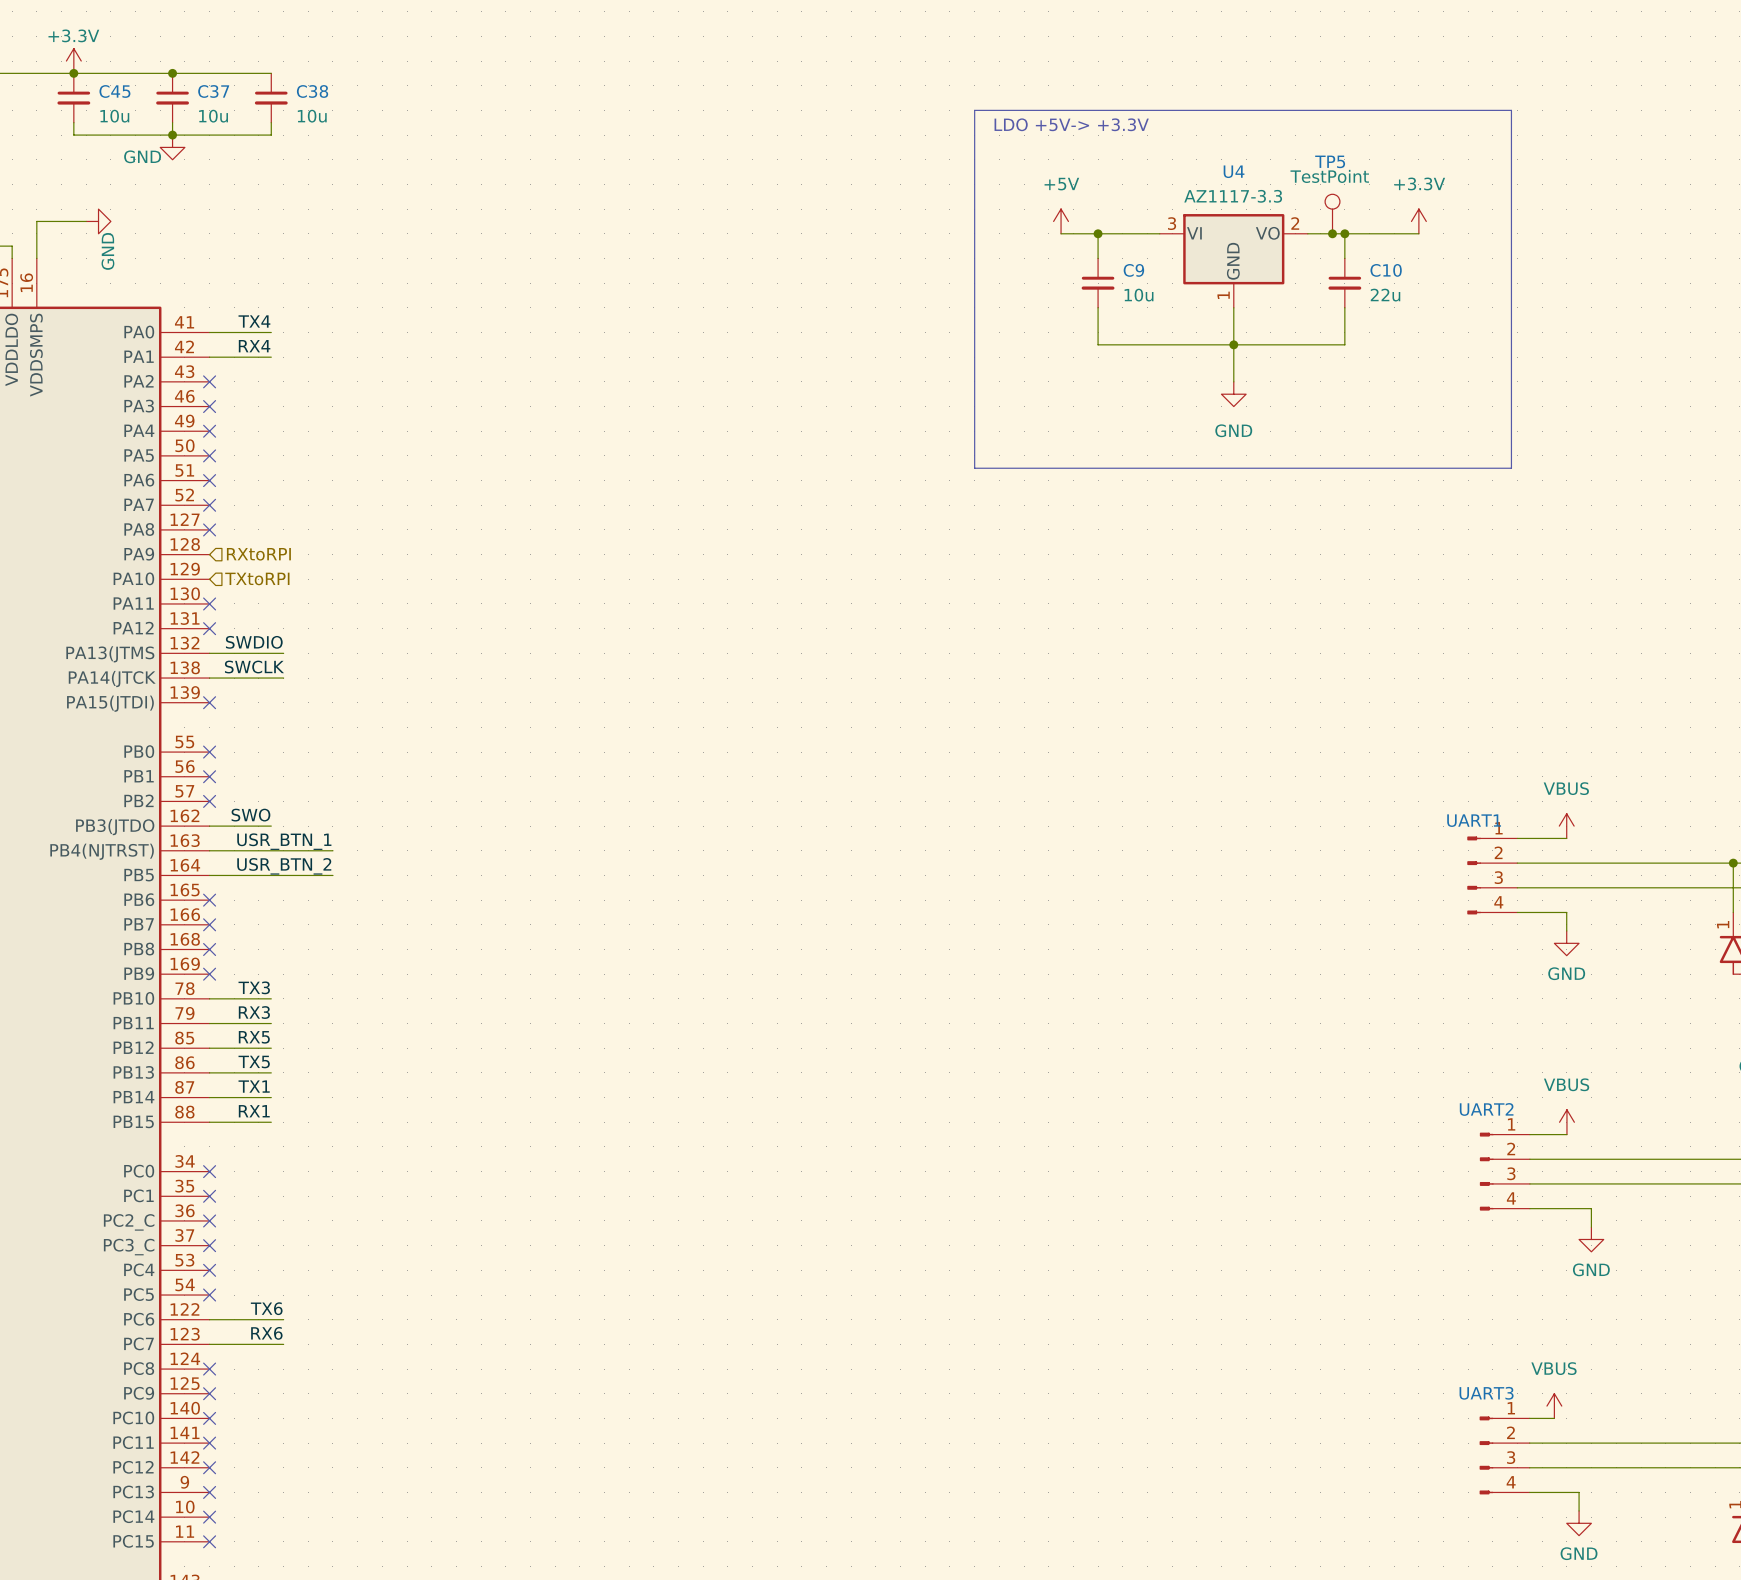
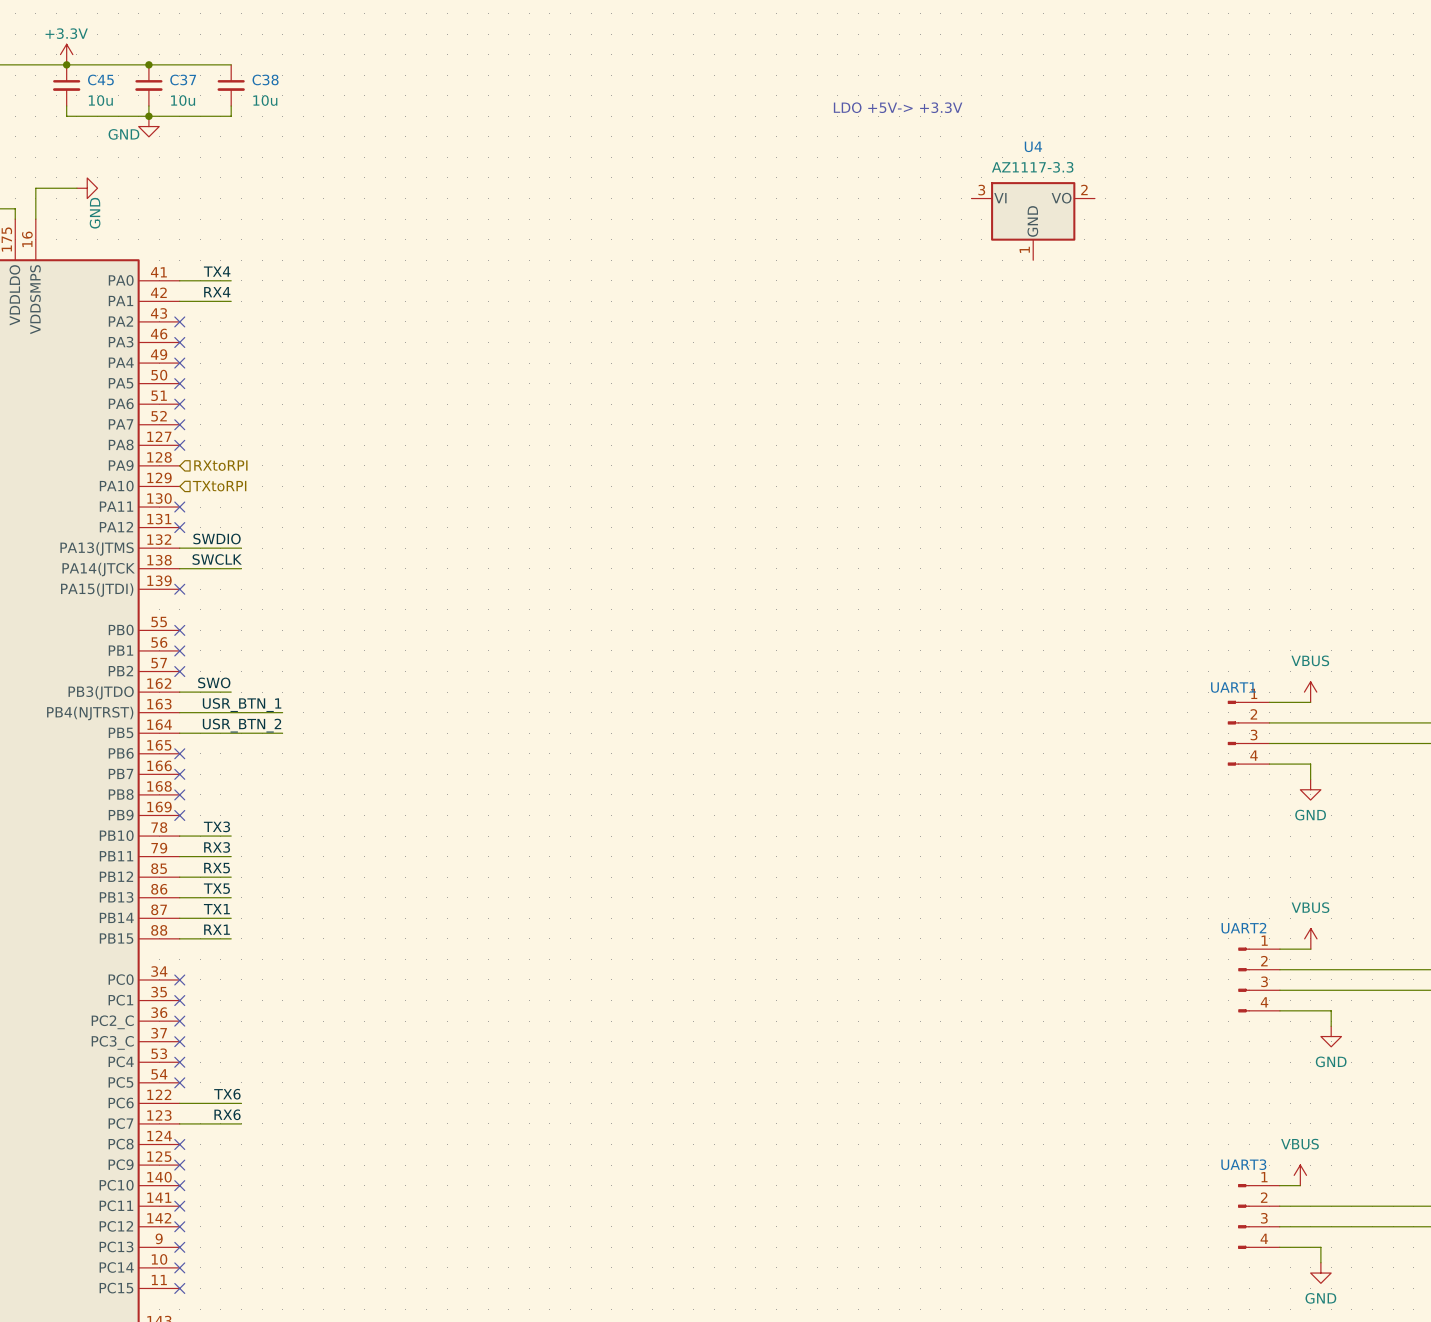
line: (974, 110) (1511, 110) (1511, 468) (974, 468) (974, 110) -> none
TP5: TestPoint (1332, 214) -> none
power symbol: +5V (1061, 221) -> none
power symbol: +3.3V (1418, 221) -> none
wire: (1061, 233) (1159, 233) -> none
wire: (1098, 233) (1098, 258) -> none
junction: (1098, 233) -> none
wire: (1307, 233) (1418, 233) -> none
junction: (1332, 233) -> none
wire: (1344, 233) (1344, 258) -> none
junction: (1344, 233) -> none
C9: 10u (1098, 283) -> none
C10: 22u (1344, 283) -> none
wire: (1098, 307) (1098, 344) (1344, 344) (1344, 307) -> none
wire: (1233, 307) (1233, 381) -> none
junction: (1233, 344) -> none
power symbol: GND (1233, 394) -> none

